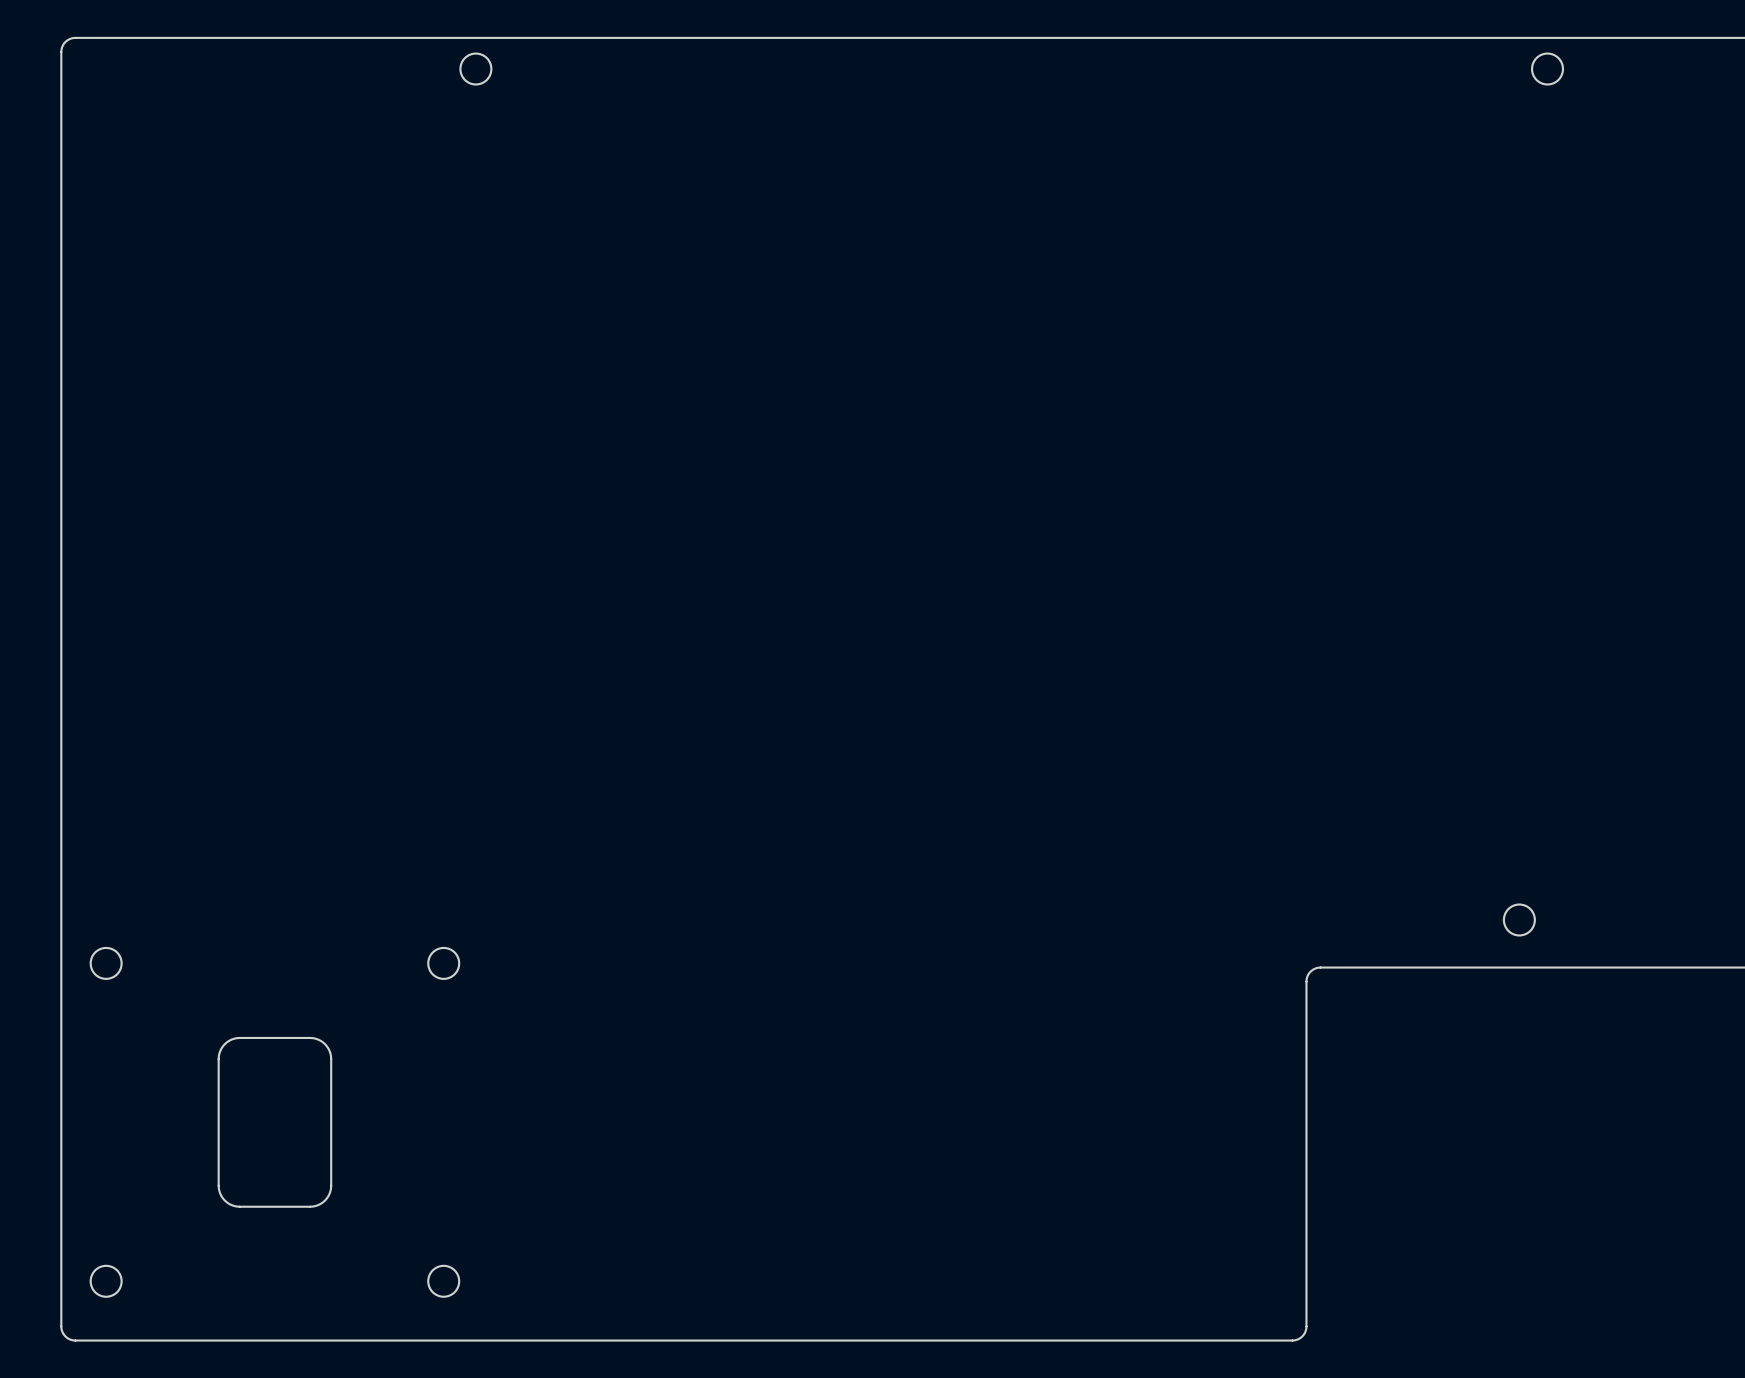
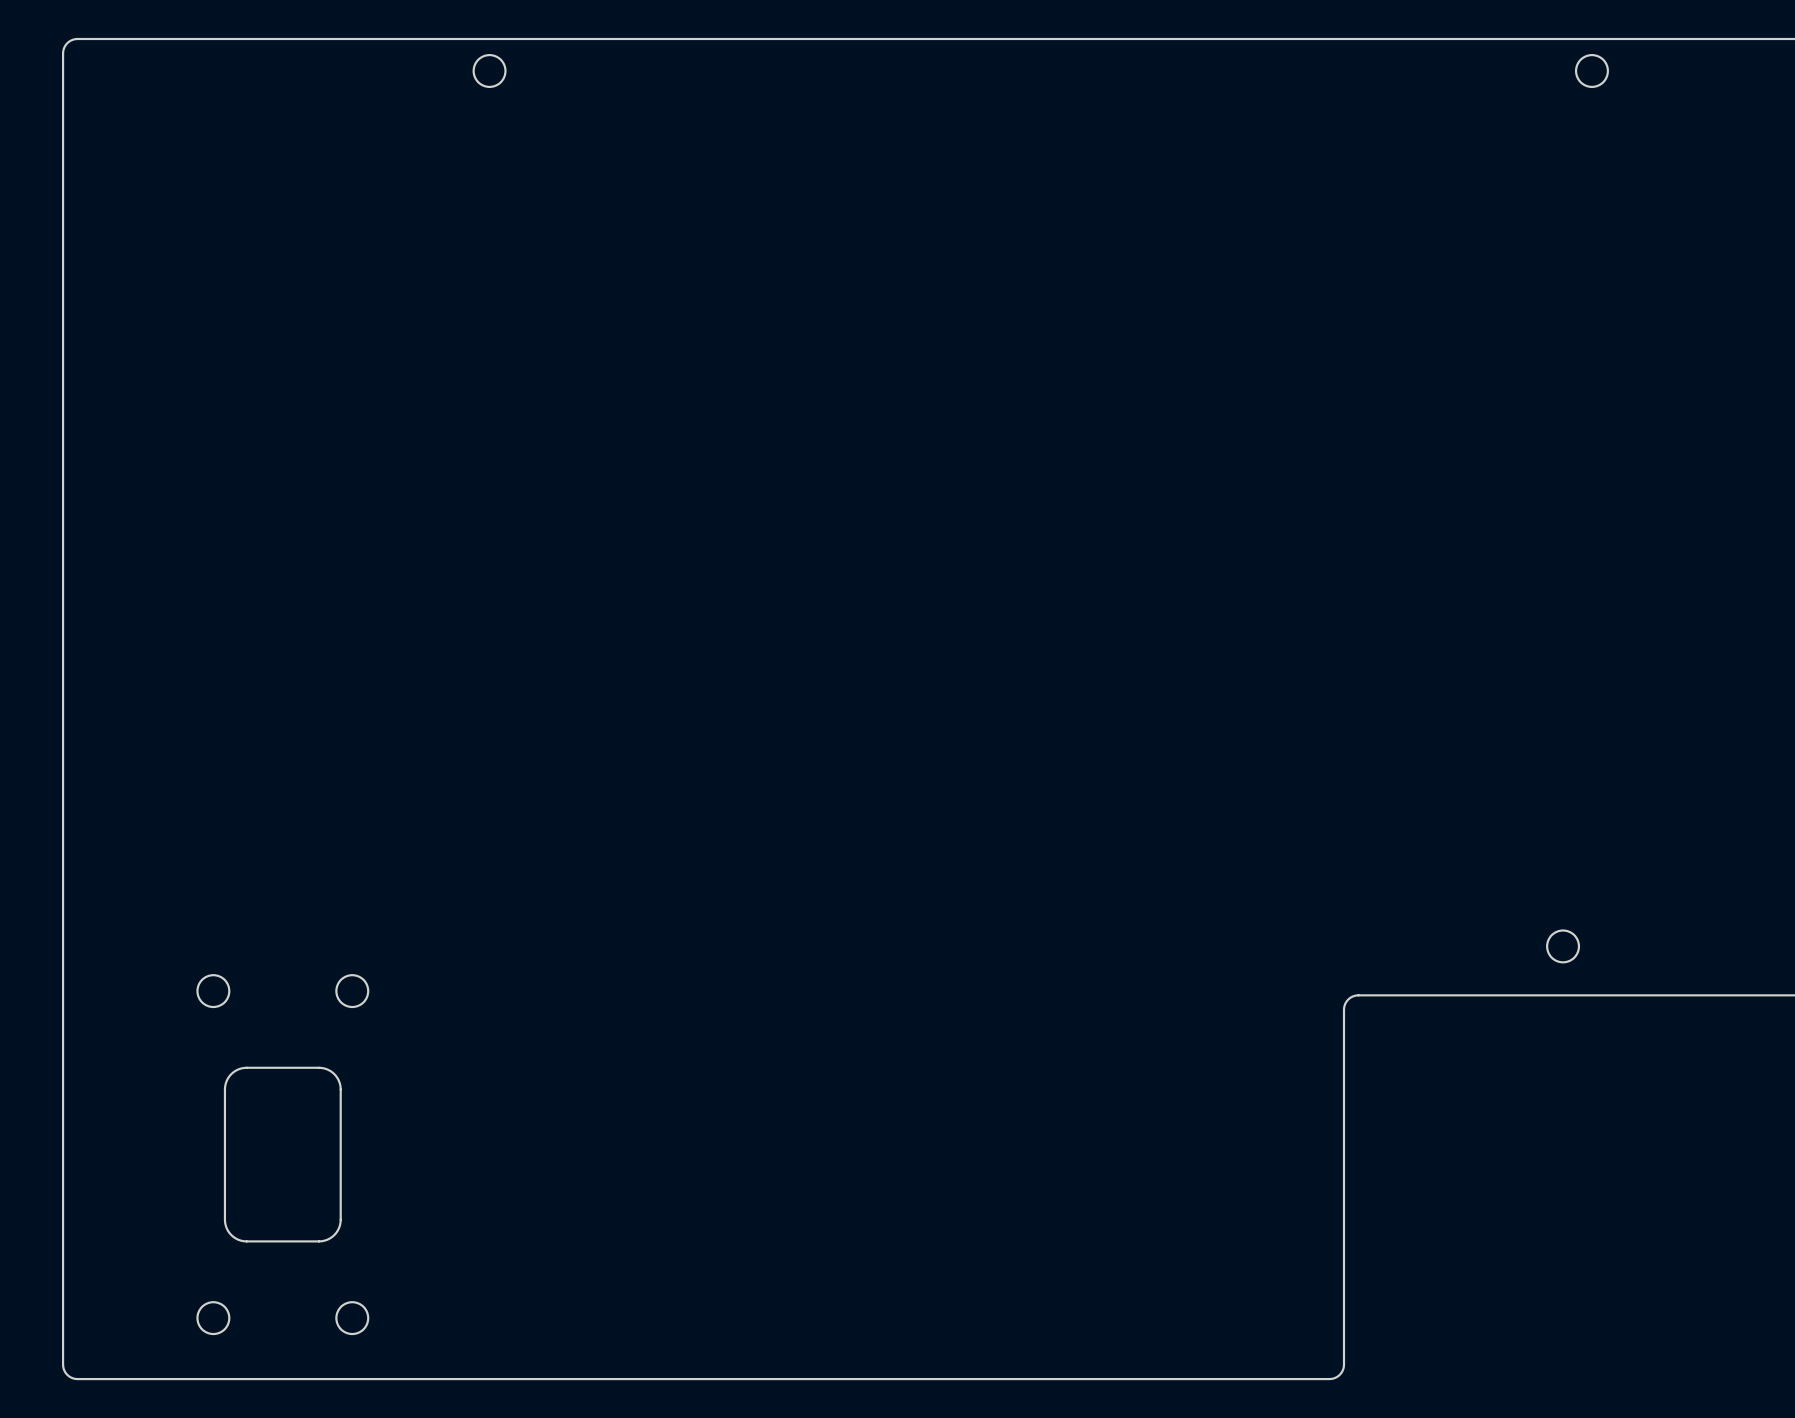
round board edge position: (106, 963) -> (213, 991)
round board edge position: (443, 963) -> (352, 991)
round board edge position: (106, 1281) -> (213, 1318)
round board edge position: (443, 1281) -> (352, 1318)

